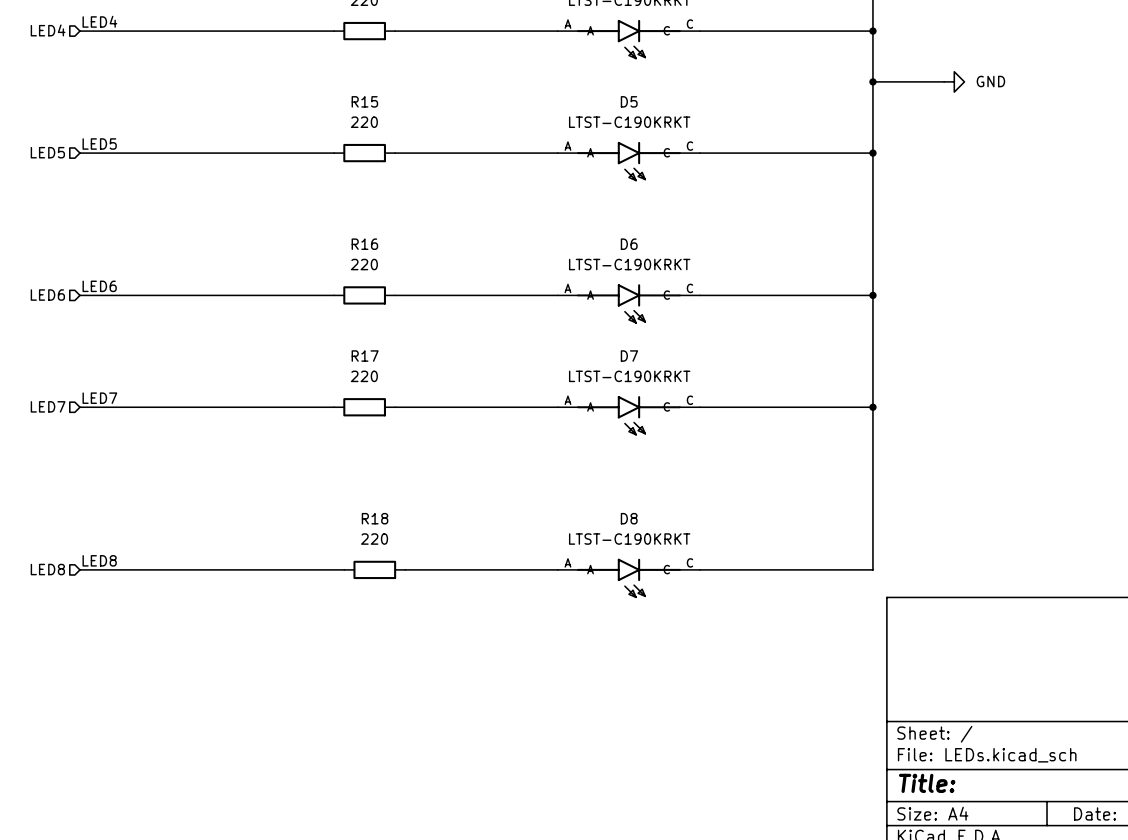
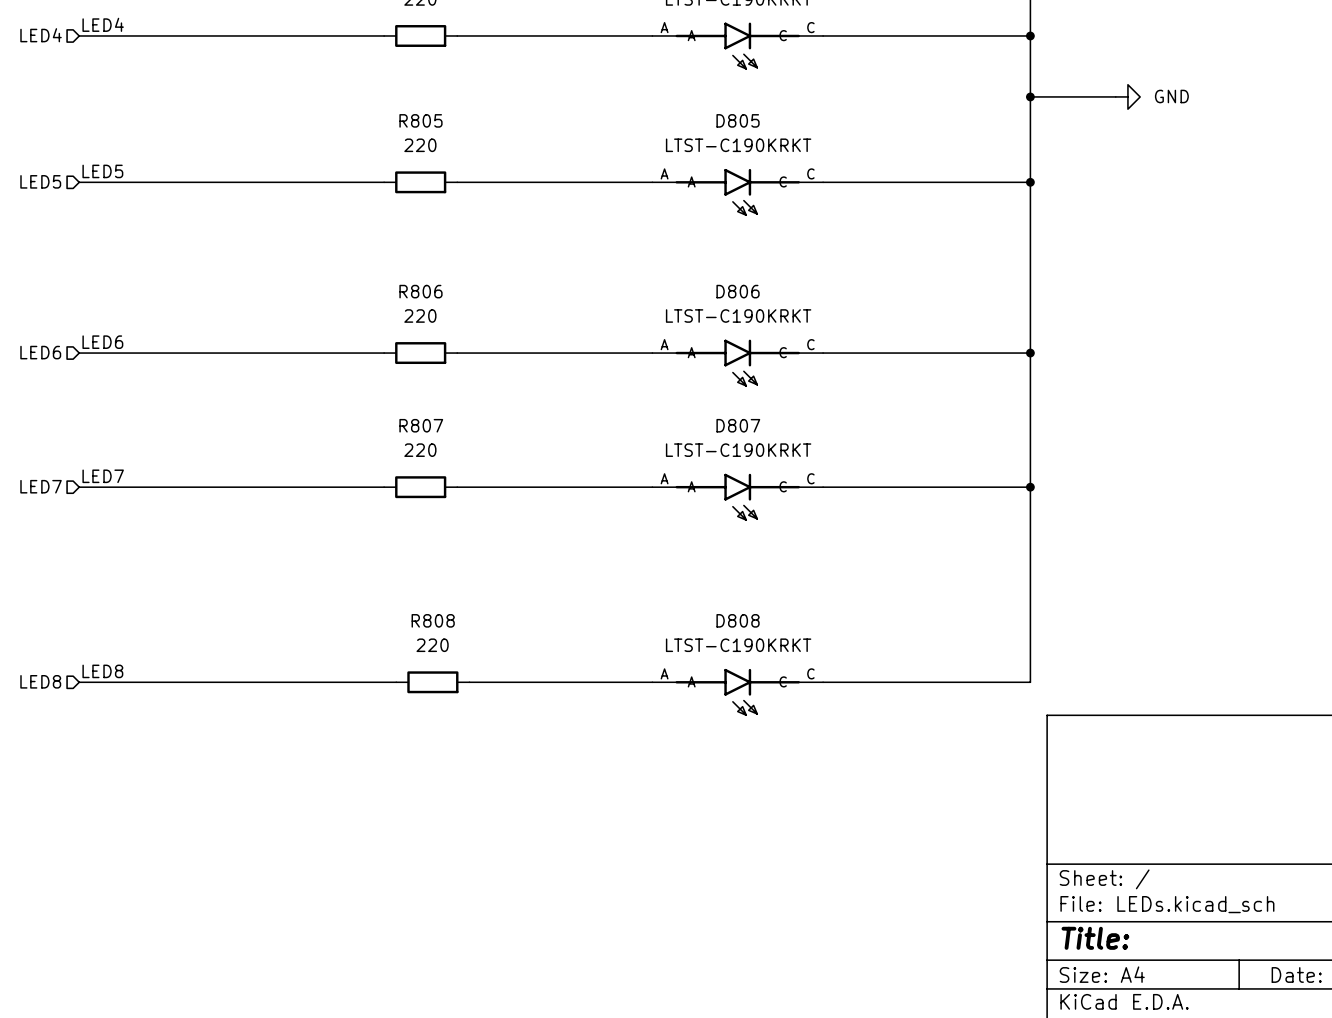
R15 name: R15 (364, 101) -> R805 (420, 120)
D5 name: D5 (629, 101) -> D805 (738, 120)
R16 name: R16 (364, 244) -> R806 (420, 291)
D6 name: D6 (629, 244) -> D806 (738, 291)
R17 name: R17 (365, 356) -> R807 (421, 425)
D7 name: D7 (629, 356) -> D807 (738, 425)
R18 name: R18 (375, 518) -> R808 (433, 620)
D8 name: D8 (629, 518) -> D808 (738, 620)

